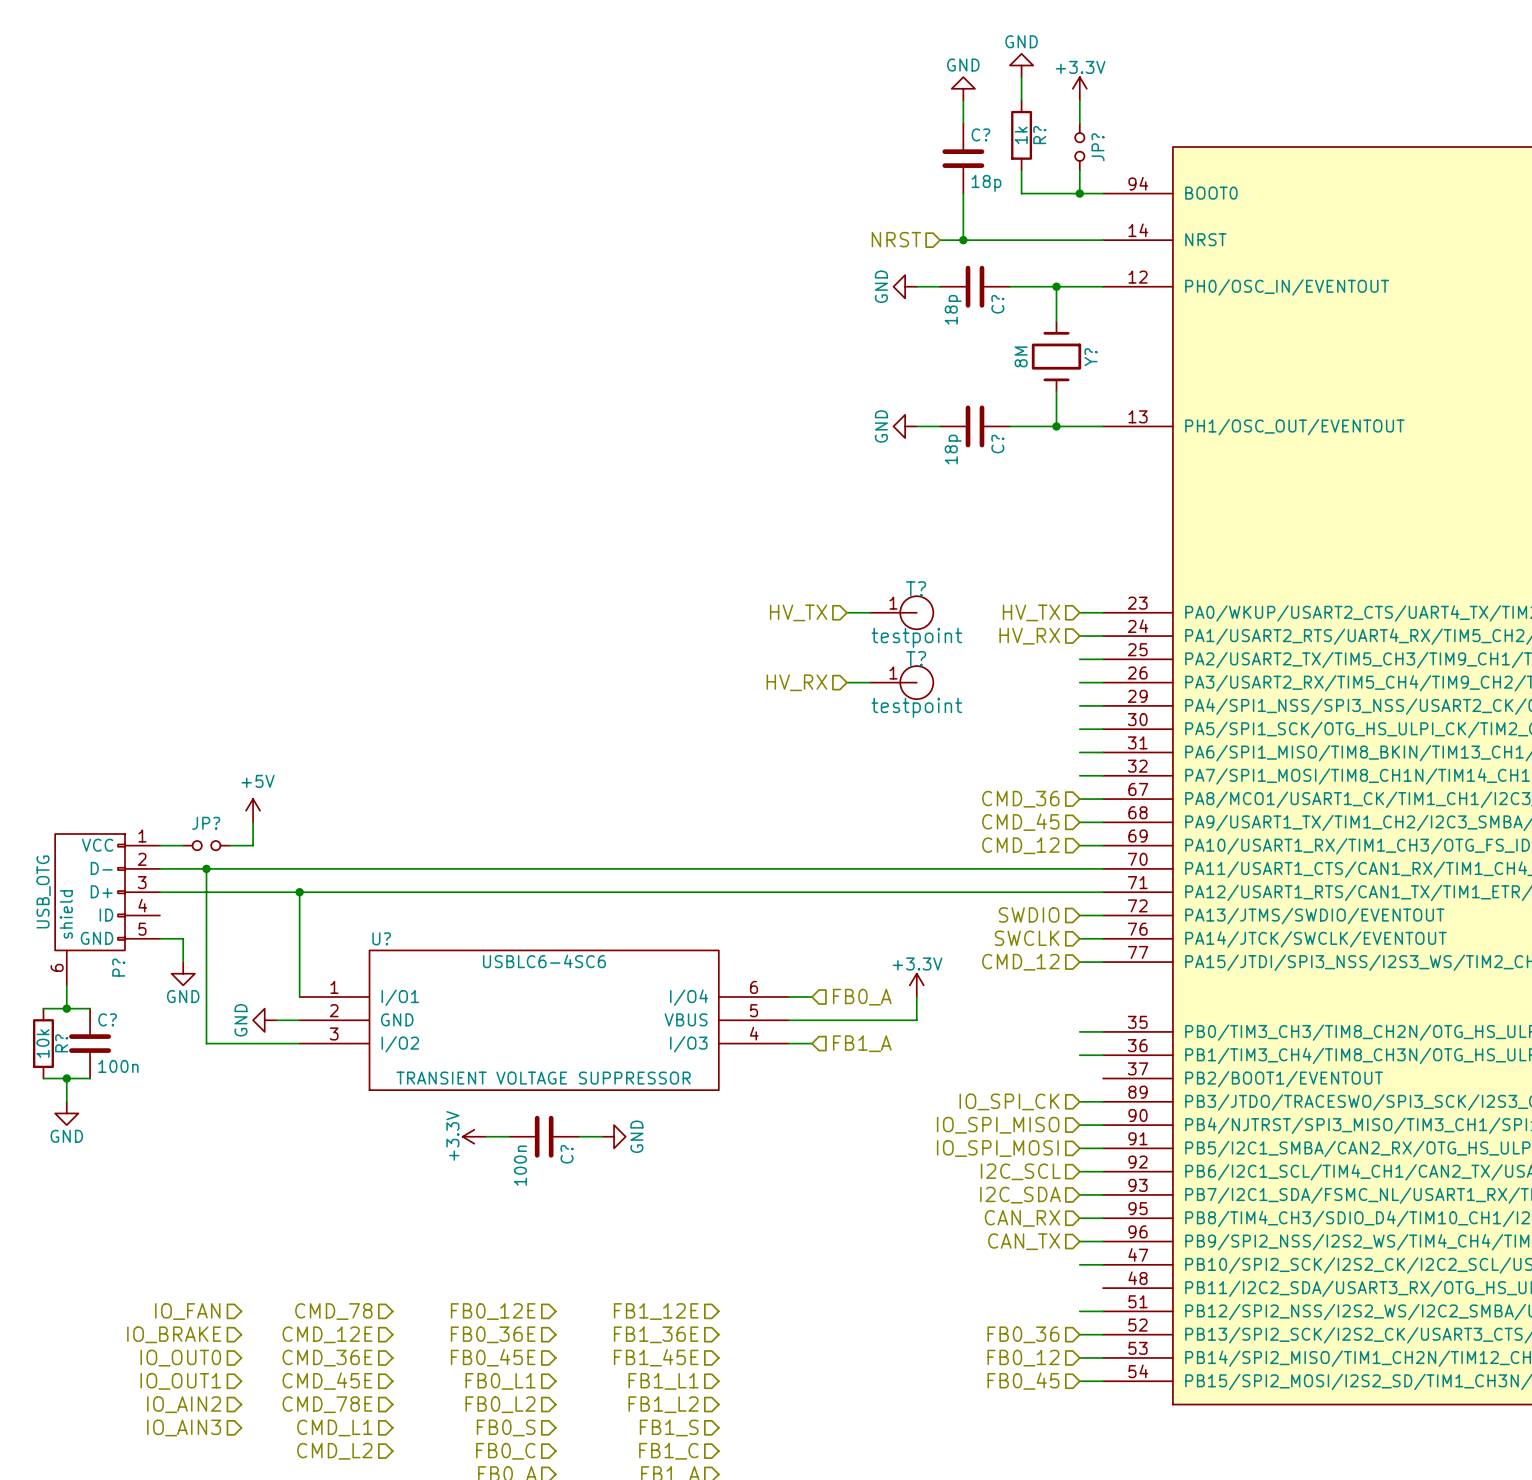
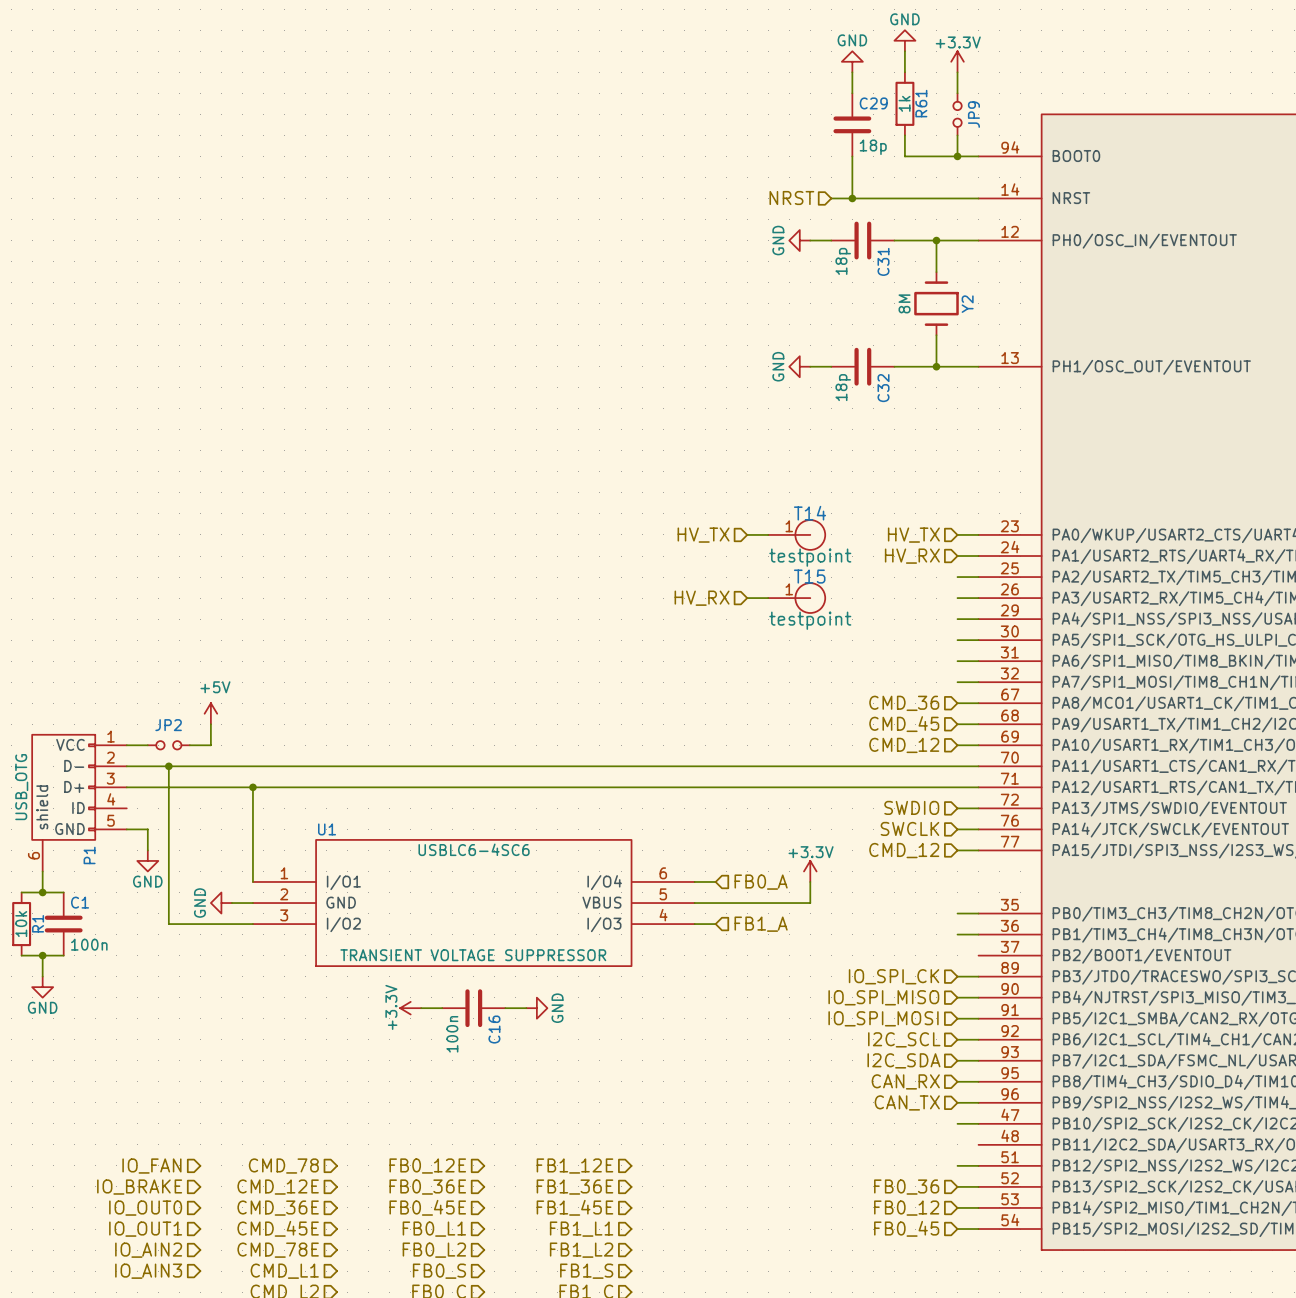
C? name: C? (980, 134) -> C29 (873, 103)
R? name: R? (1039, 135) -> R61 (921, 103)
JP? name: JP? (1097, 147) -> JP9 (973, 114)
C? name: C? (997, 304) -> C31 (883, 261)
Y? name: Y? (1091, 357) -> Y2 (967, 304)
C? name: C? (997, 444) -> C32 (883, 388)
T? name: T? (916, 588) -> T14 (810, 513)
T? name: T? (916, 658) -> T15 (809, 576)
JP? name: JP? (206, 823) -> JP2 (168, 725)
U? name: U? (381, 938) -> U1 (327, 829)
P? name: P? (118, 967) -> P1 (89, 855)
C? name: C? (107, 1019) -> C1 (80, 902)
R? name: R? (61, 1043) -> R1 (38, 923)
C? name: C? (567, 1154) -> C16 (494, 1029)

